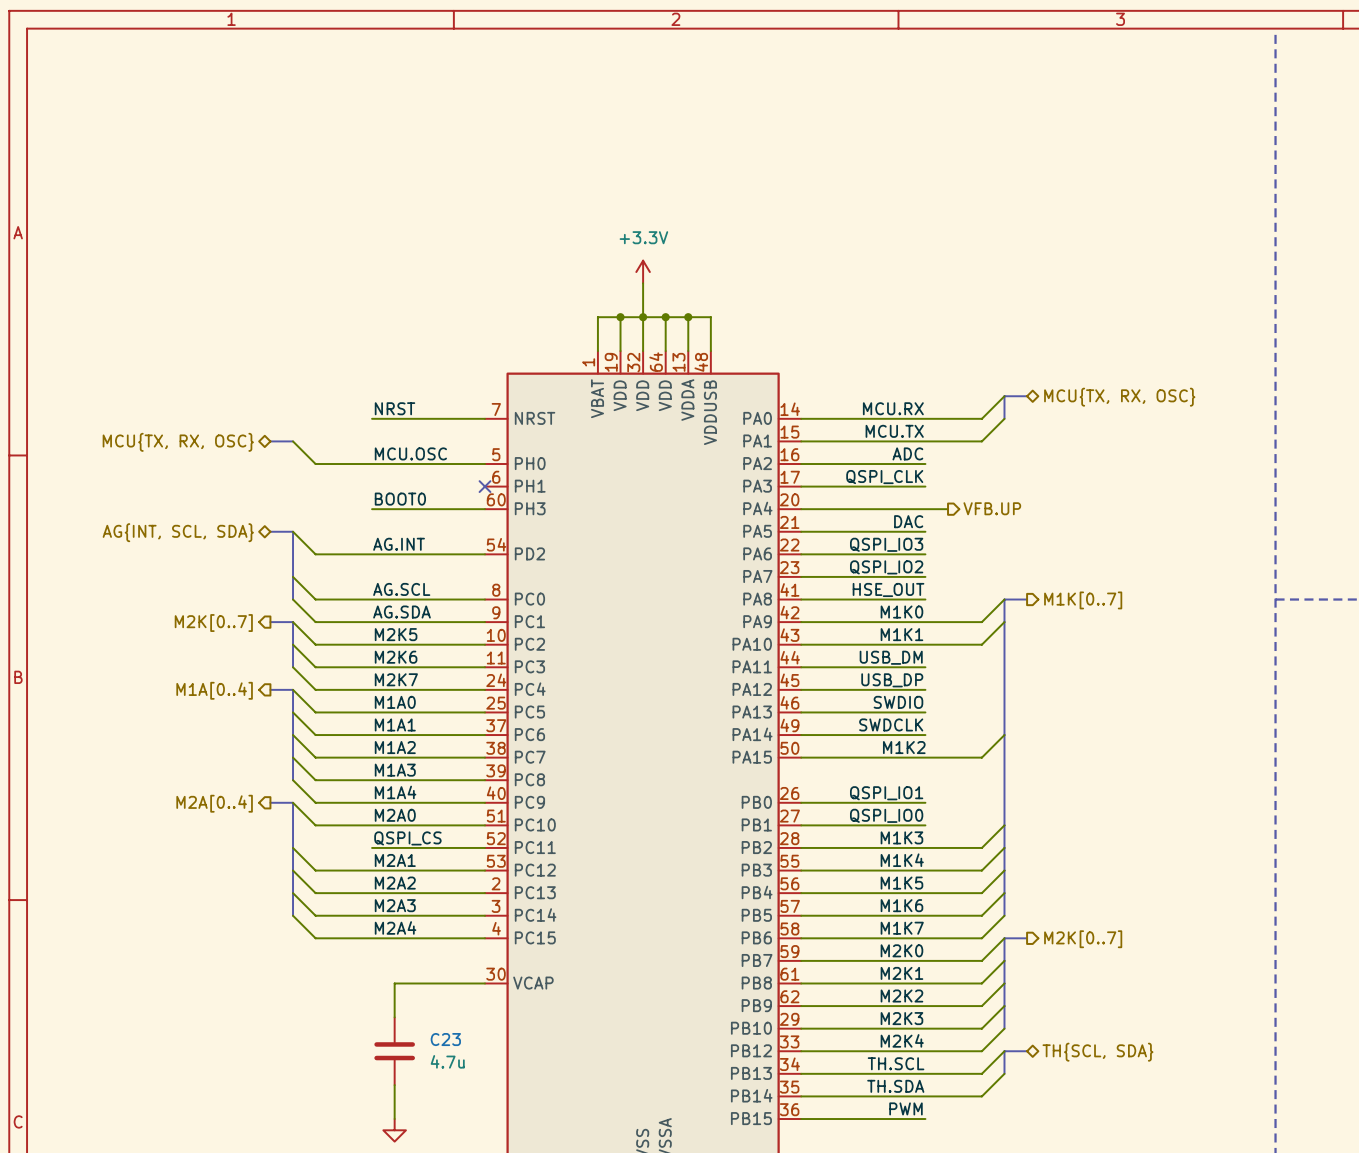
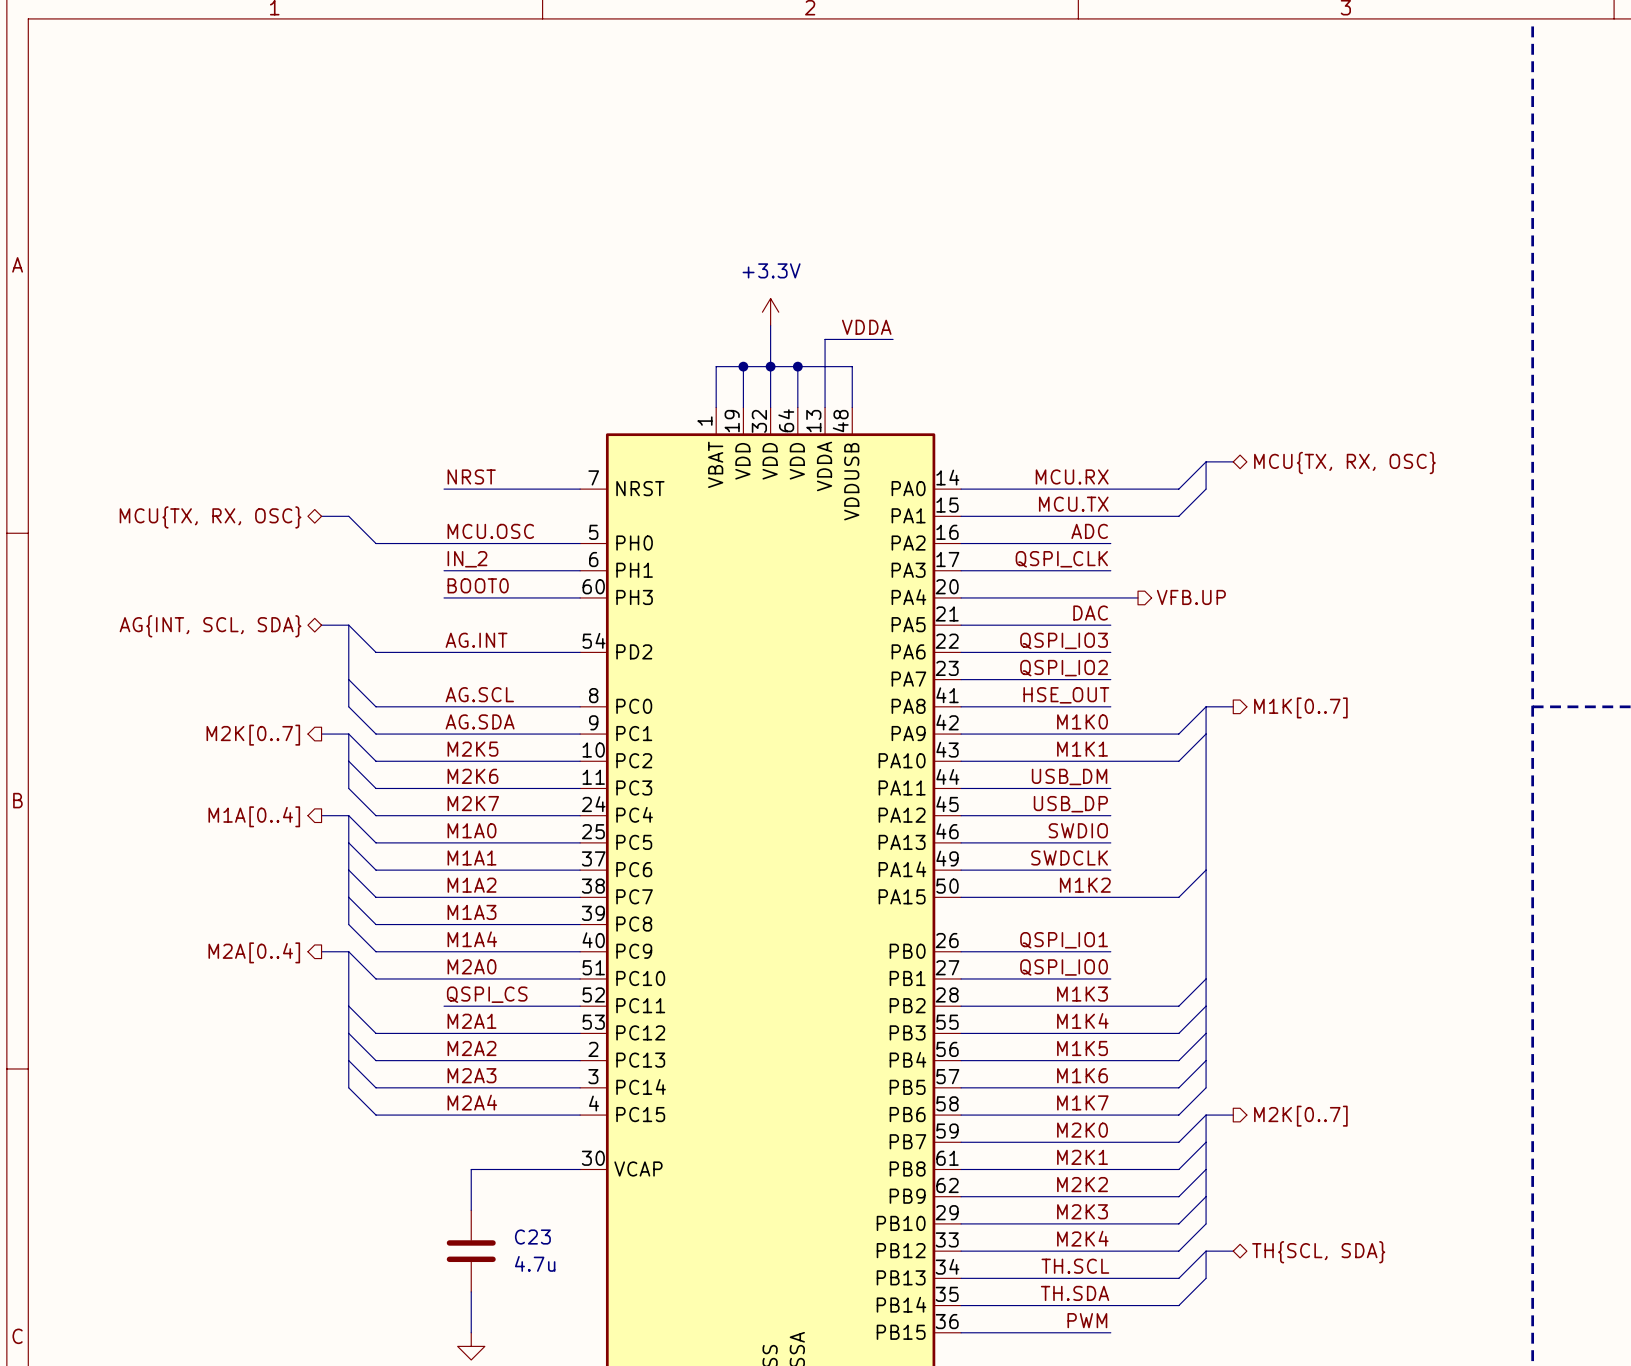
label: none -> VDDA (866, 327)
wire: none -> (893, 339) (825, 339) (825, 366)
junction: (688, 317) -> none
label: none -> IN_2 (467, 559)
wire: none -> (444, 570) (580, 570)
no-connect mark: (485, 486) -> none

